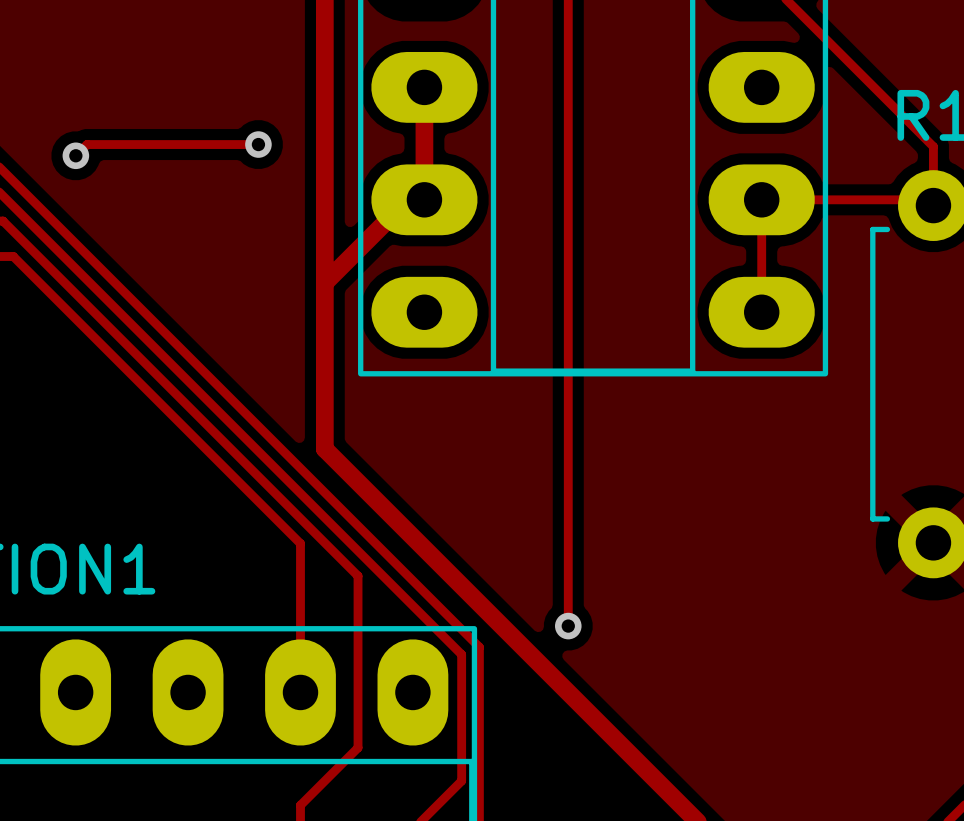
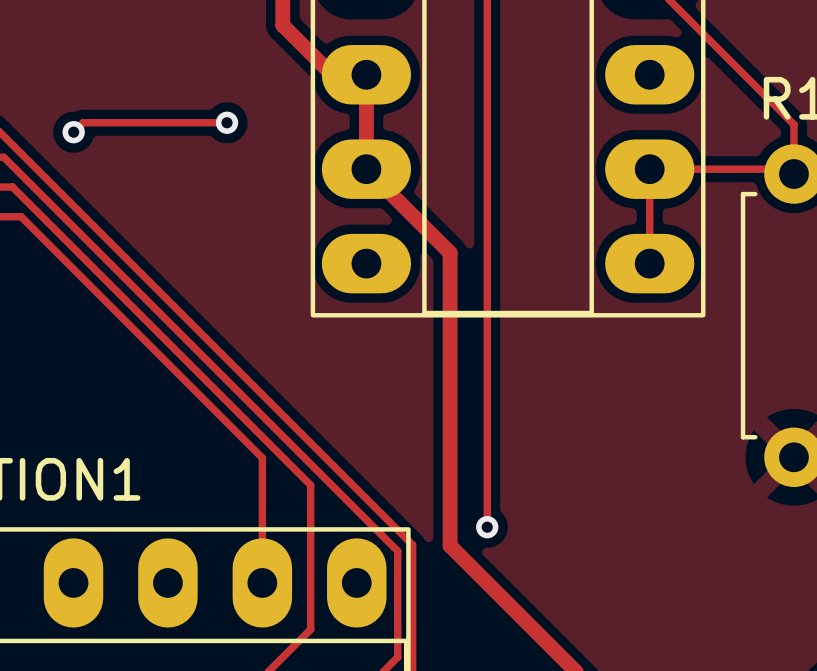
track: (324, 28) (324, 449) (524, 648) -> (366, 169) (450, 252) (450, 545)
track: none -> (282, 25) (332, 74) (366, 74)
track: (408, 199) (324, 283) -> none

